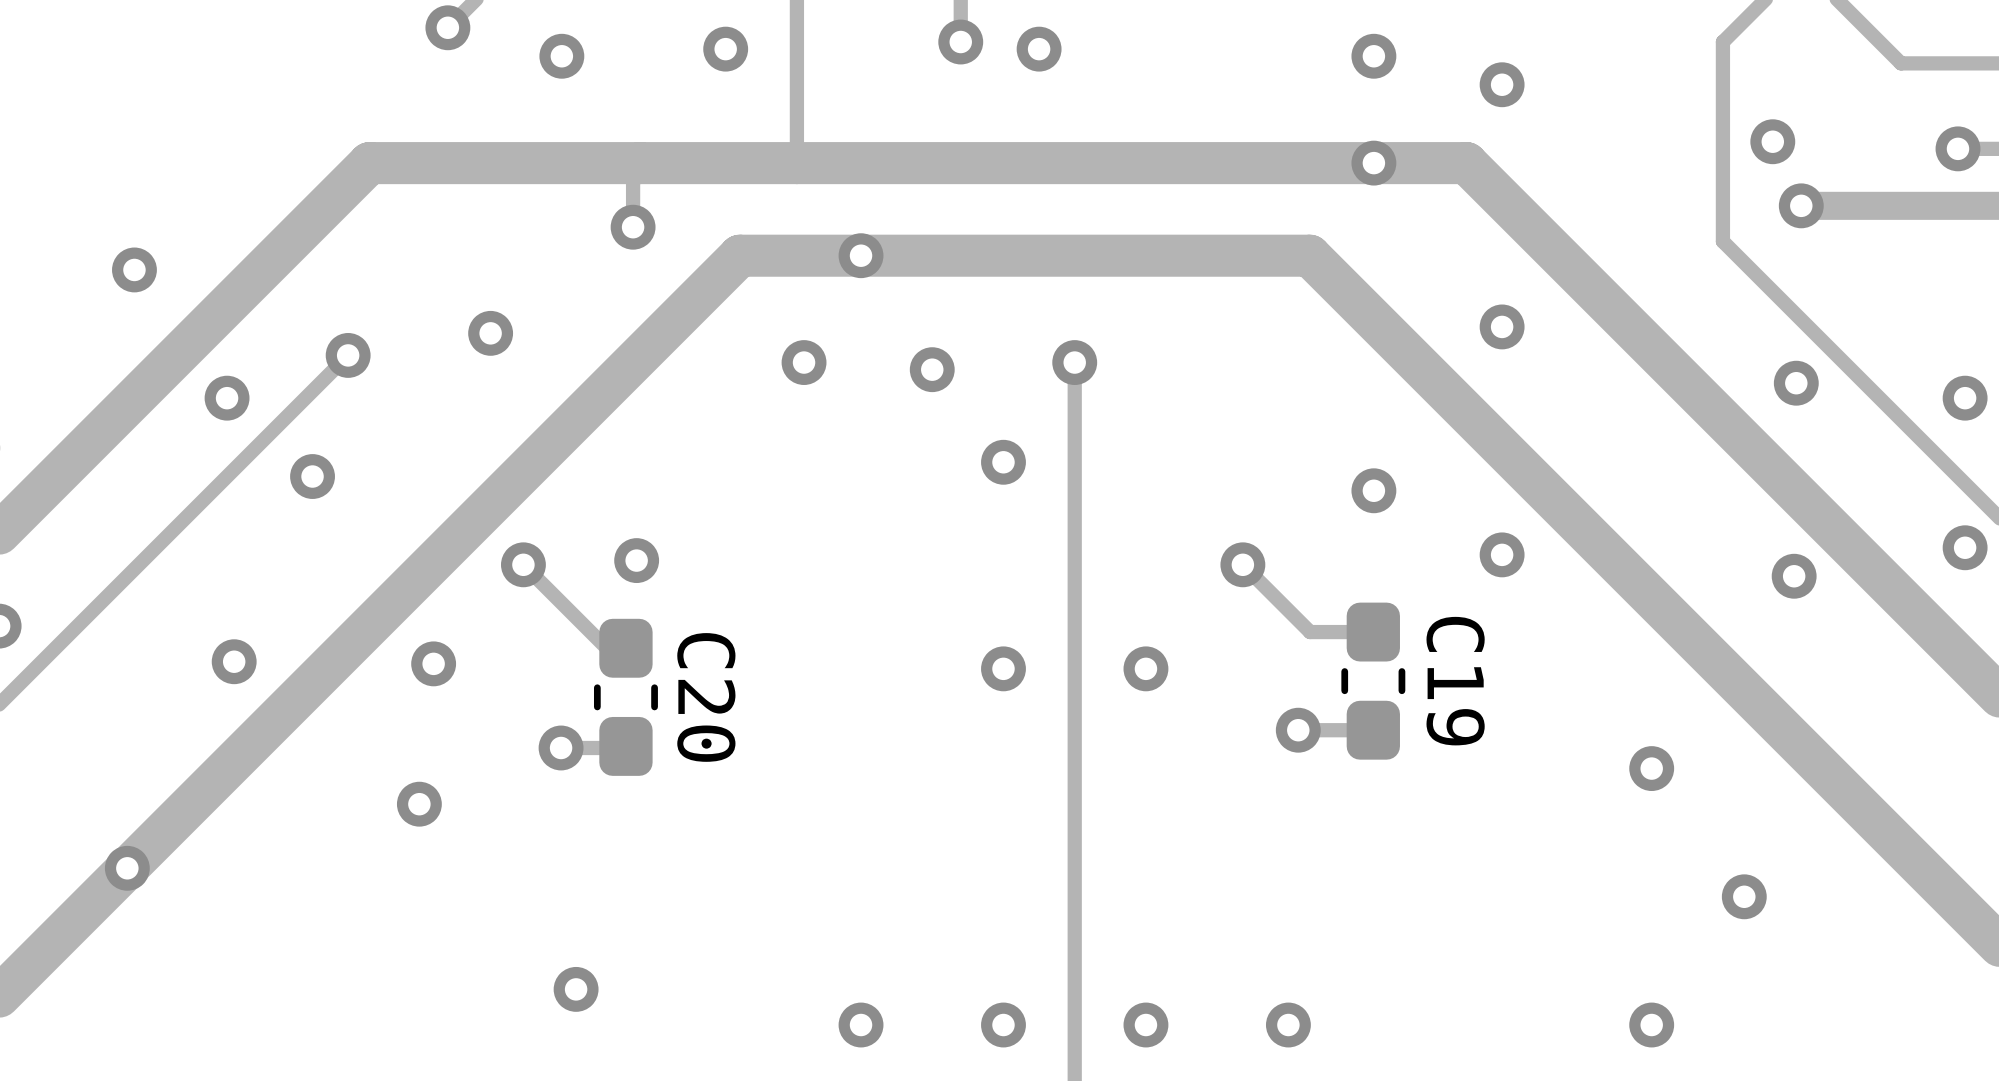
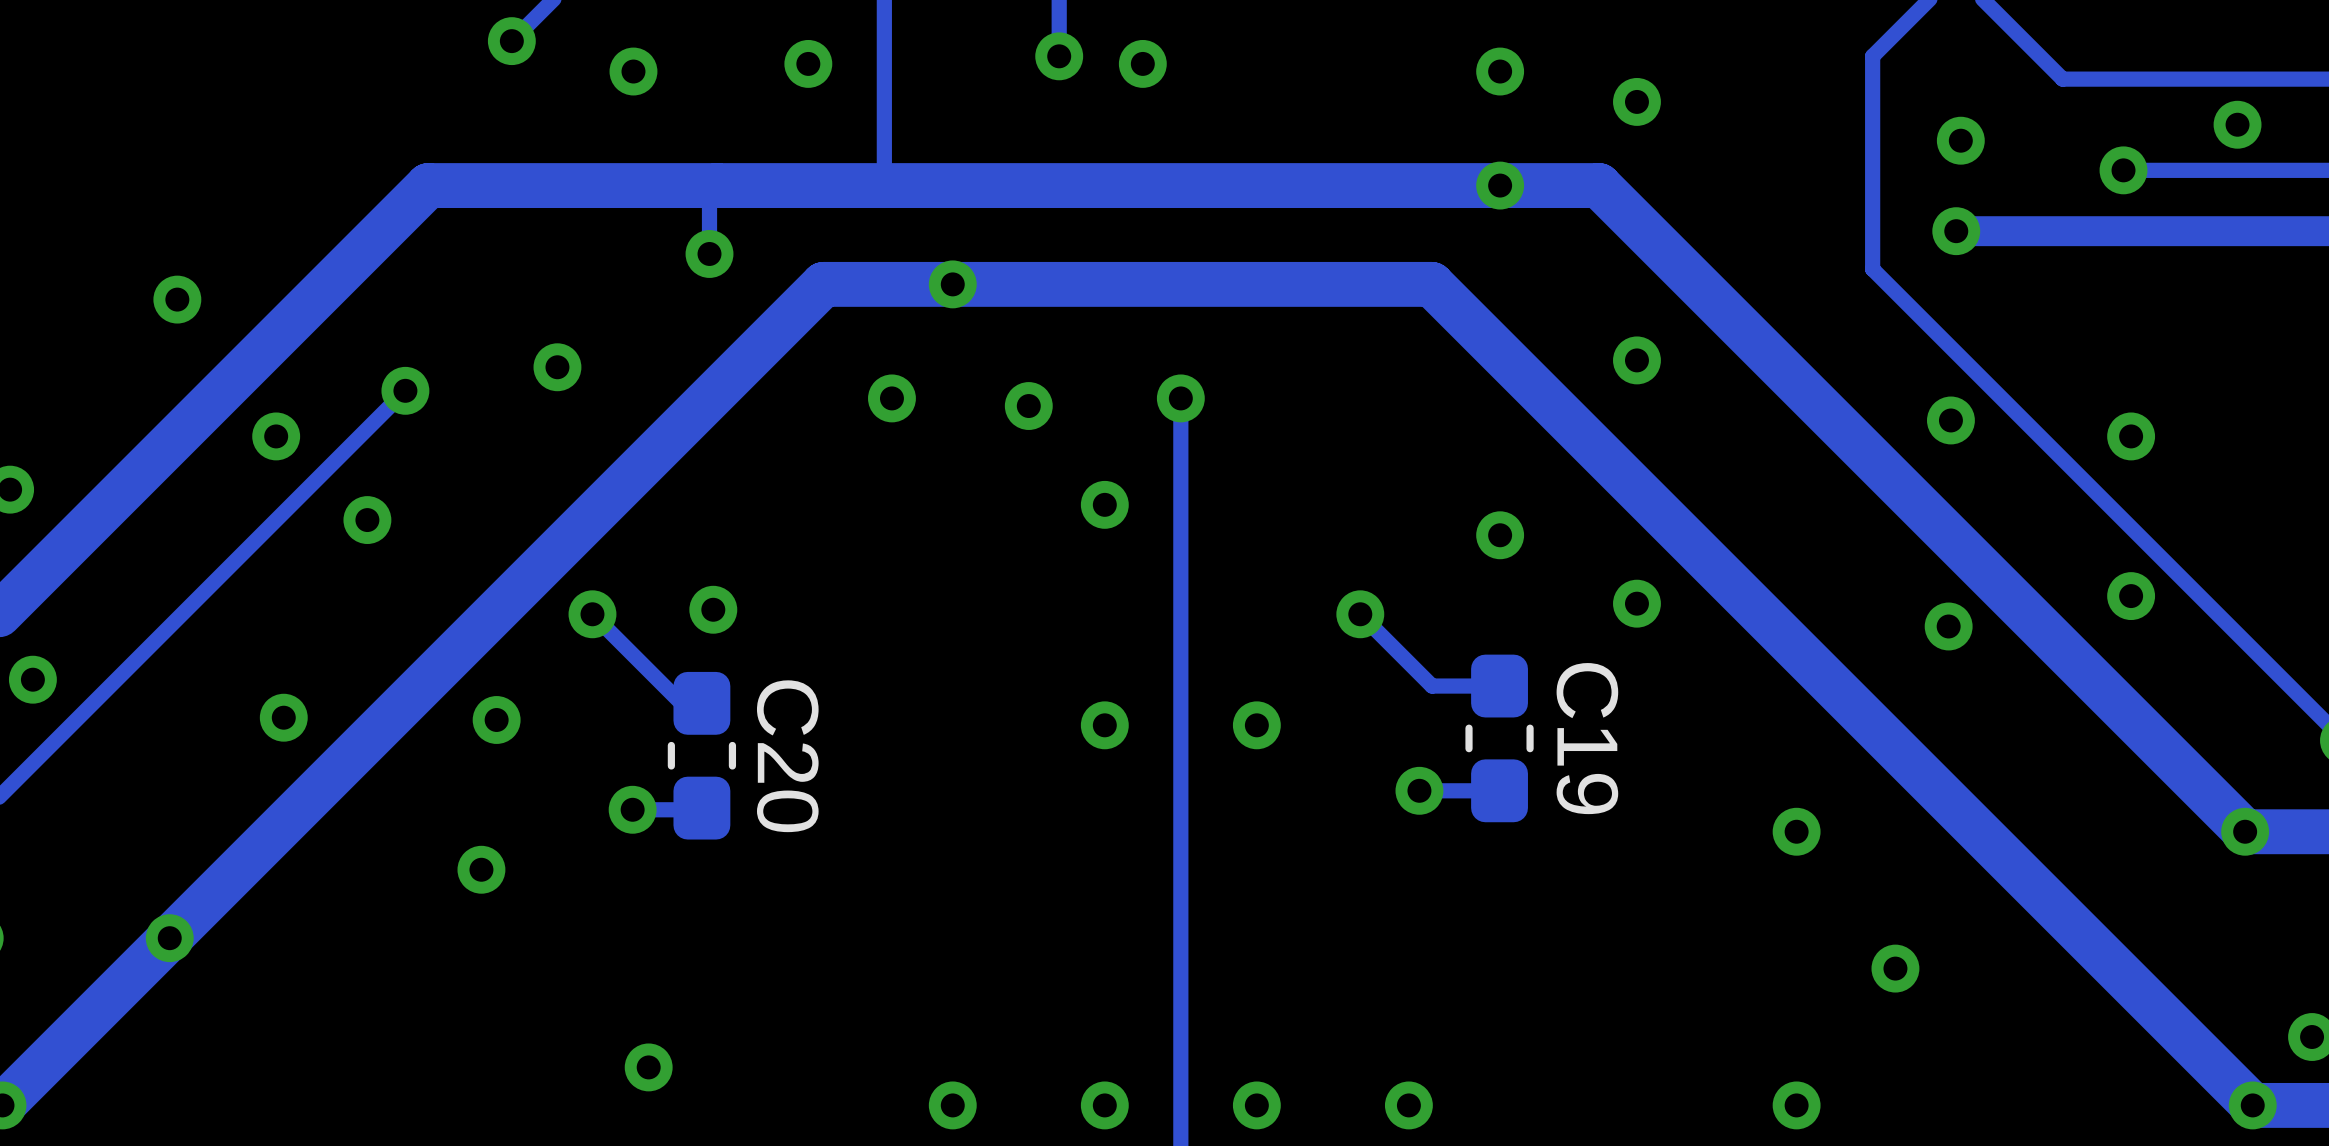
via position: (1772, 141) -> (1960, 140)

